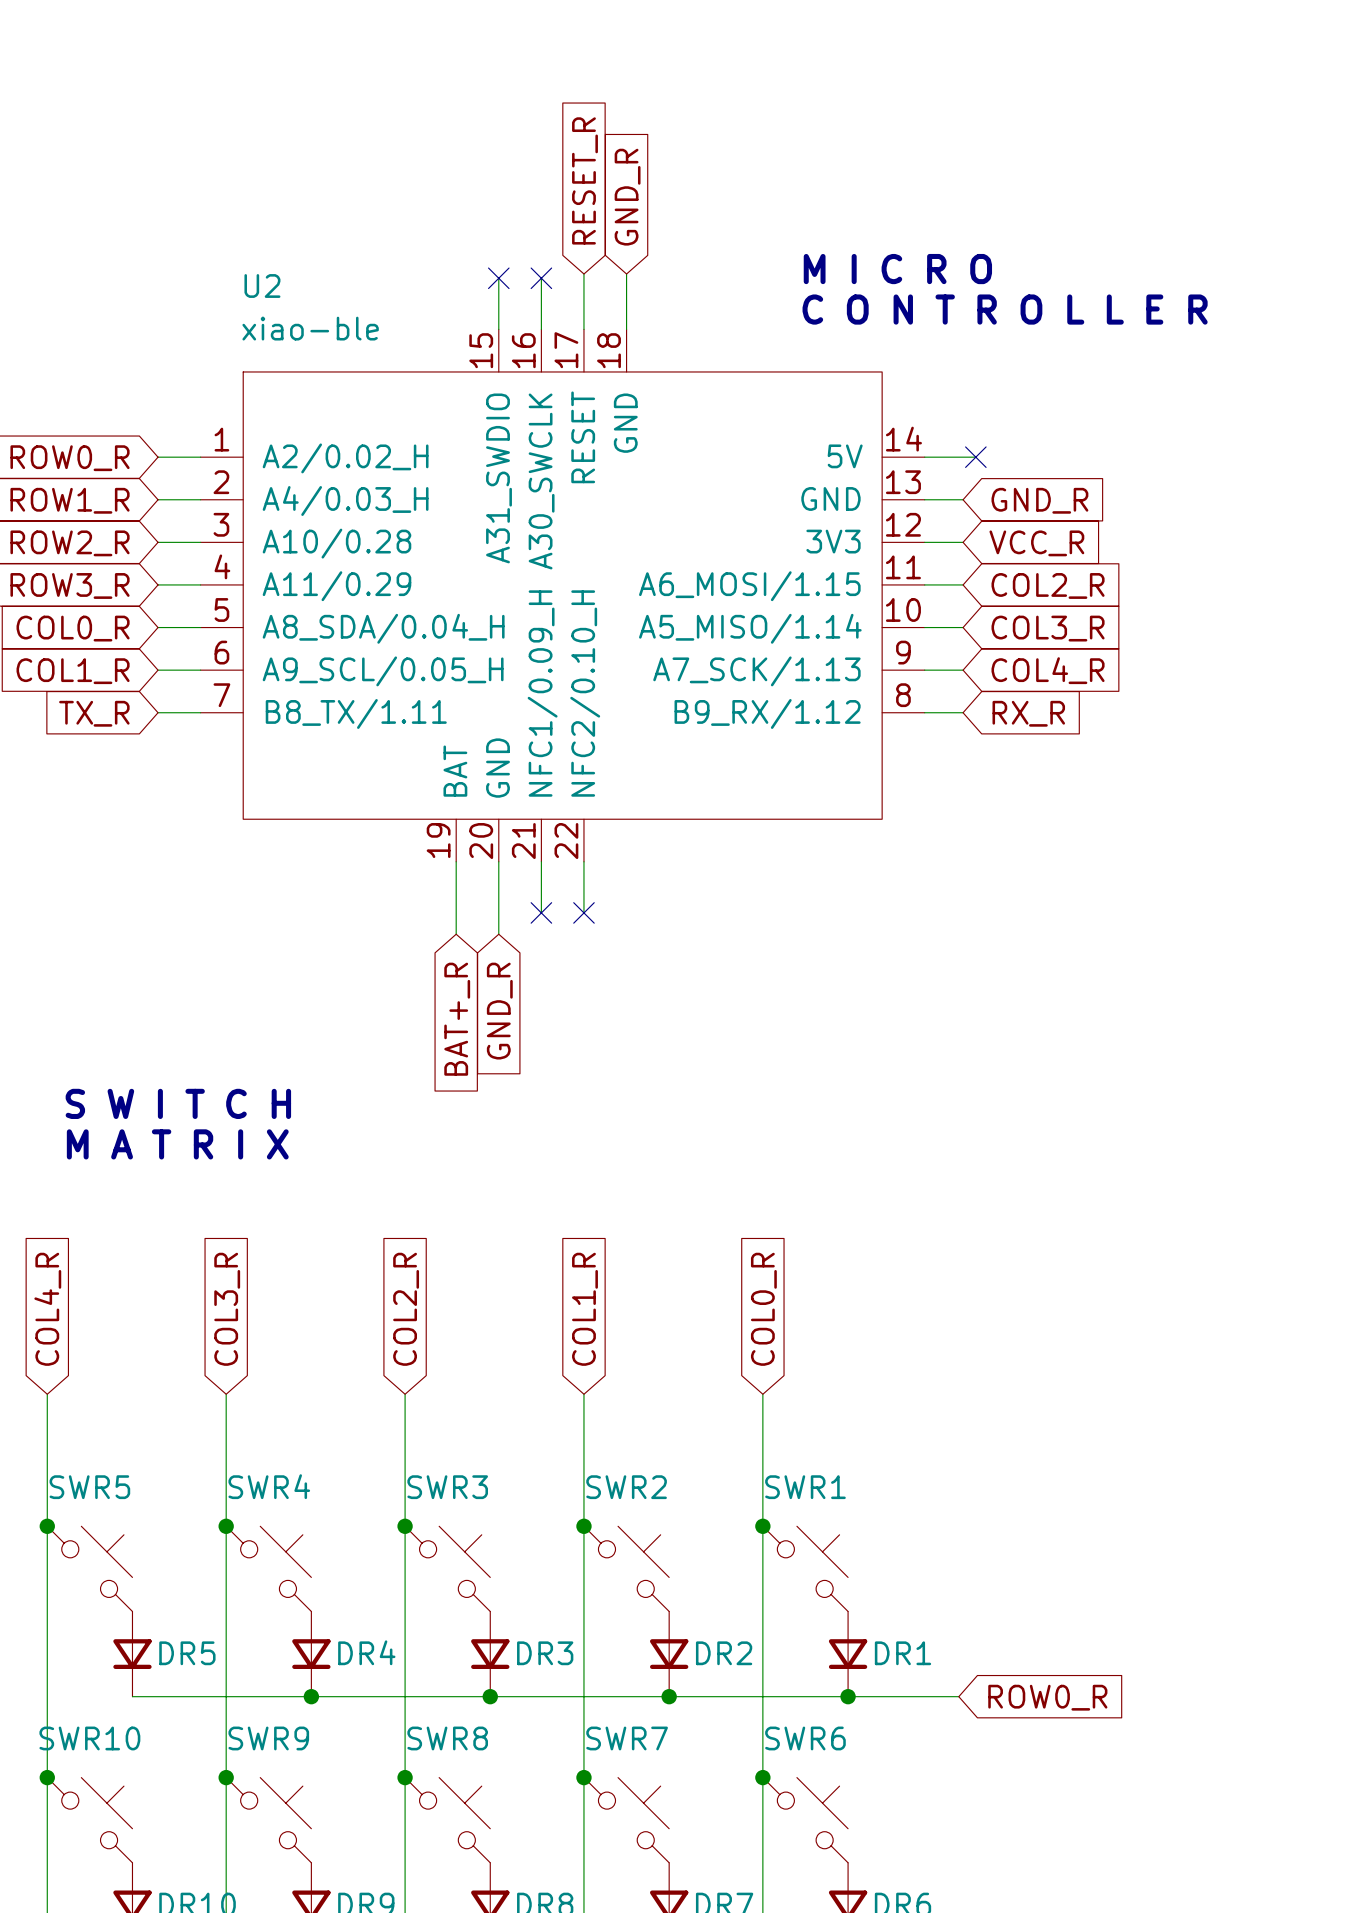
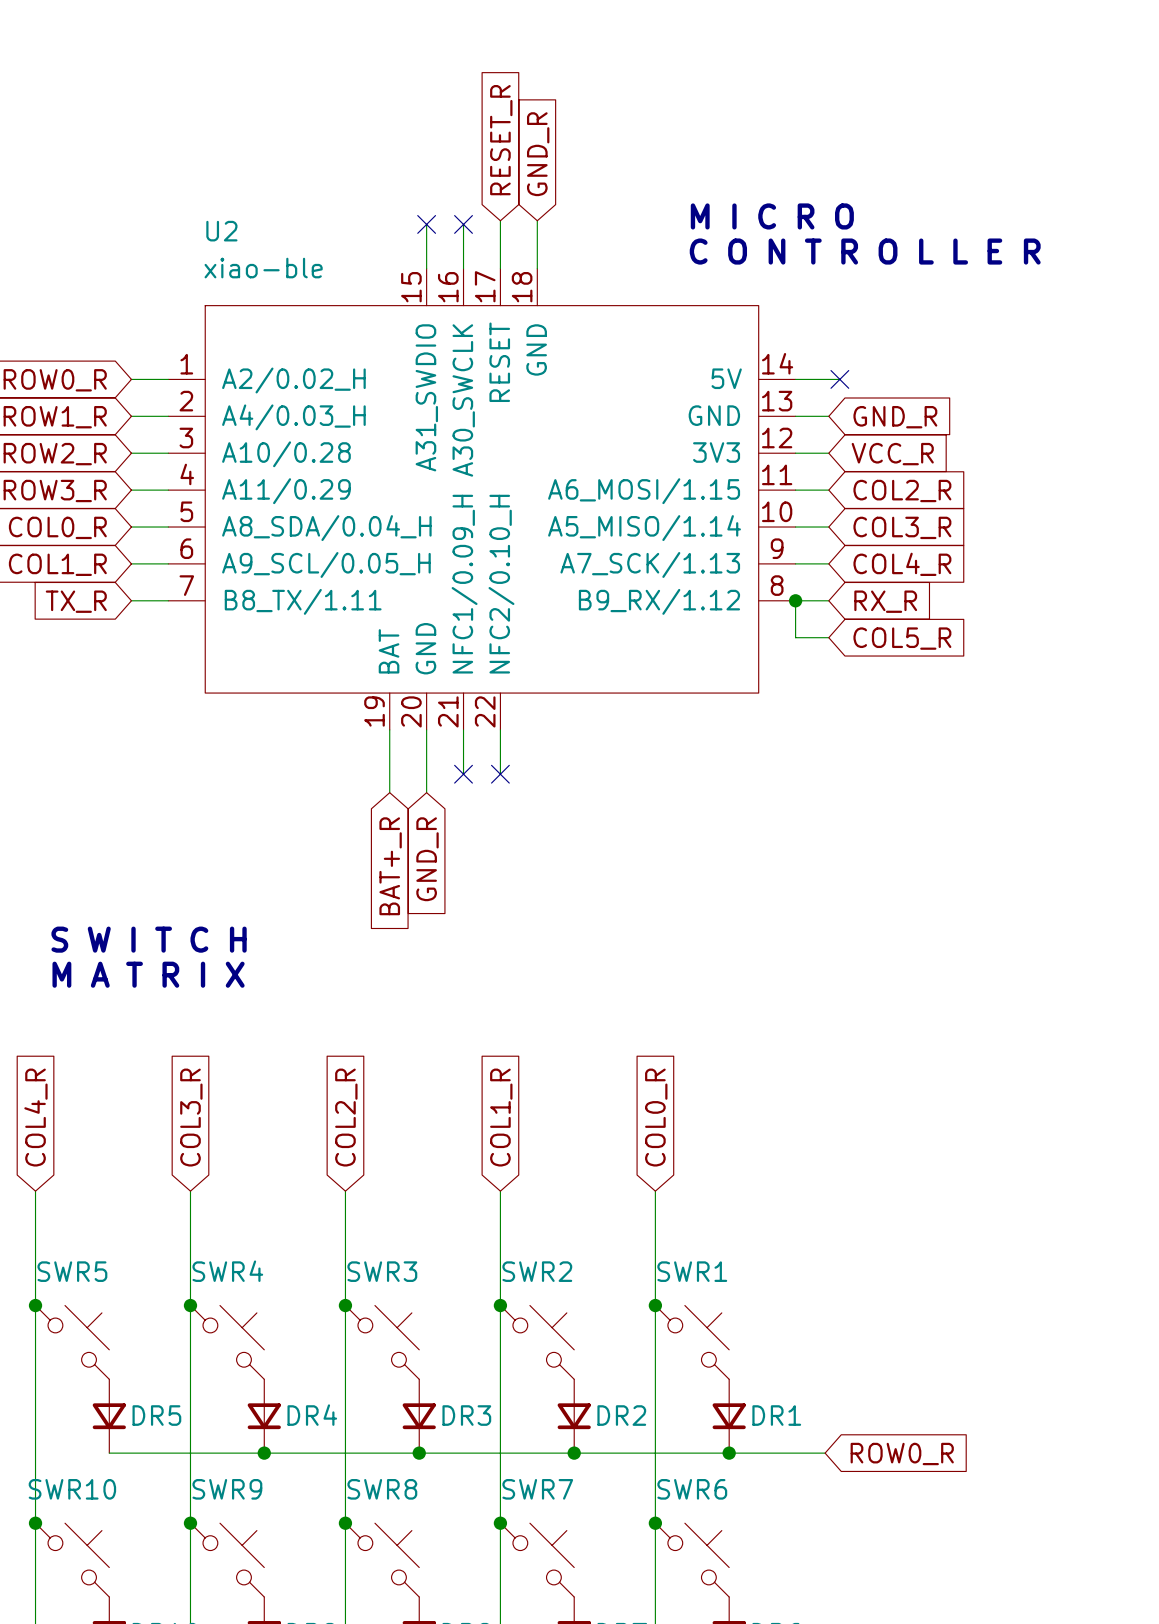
wire: none -> (795, 600) (795, 637) (828, 637)
junction: none -> (795, 600)
global label: none -> COL5_R (902, 638)

